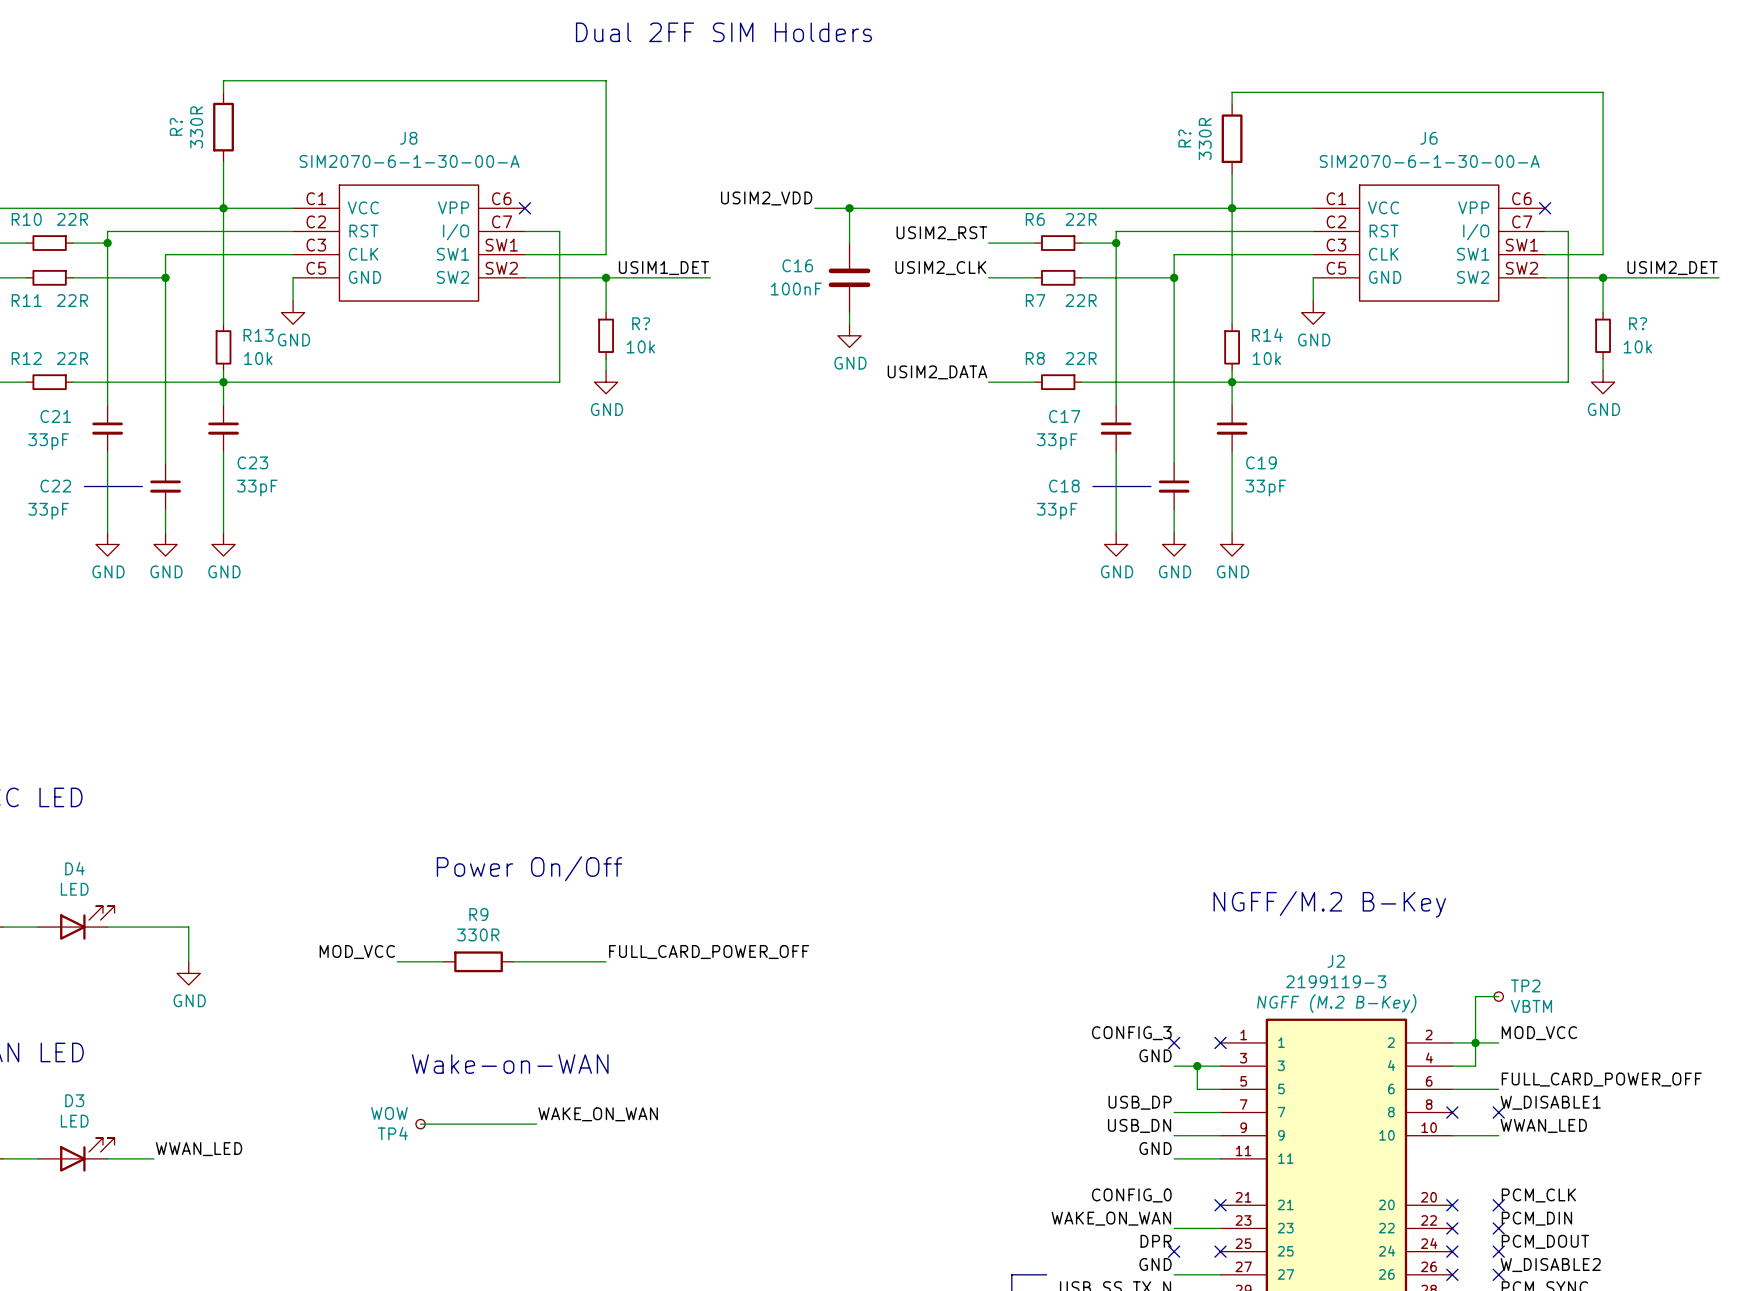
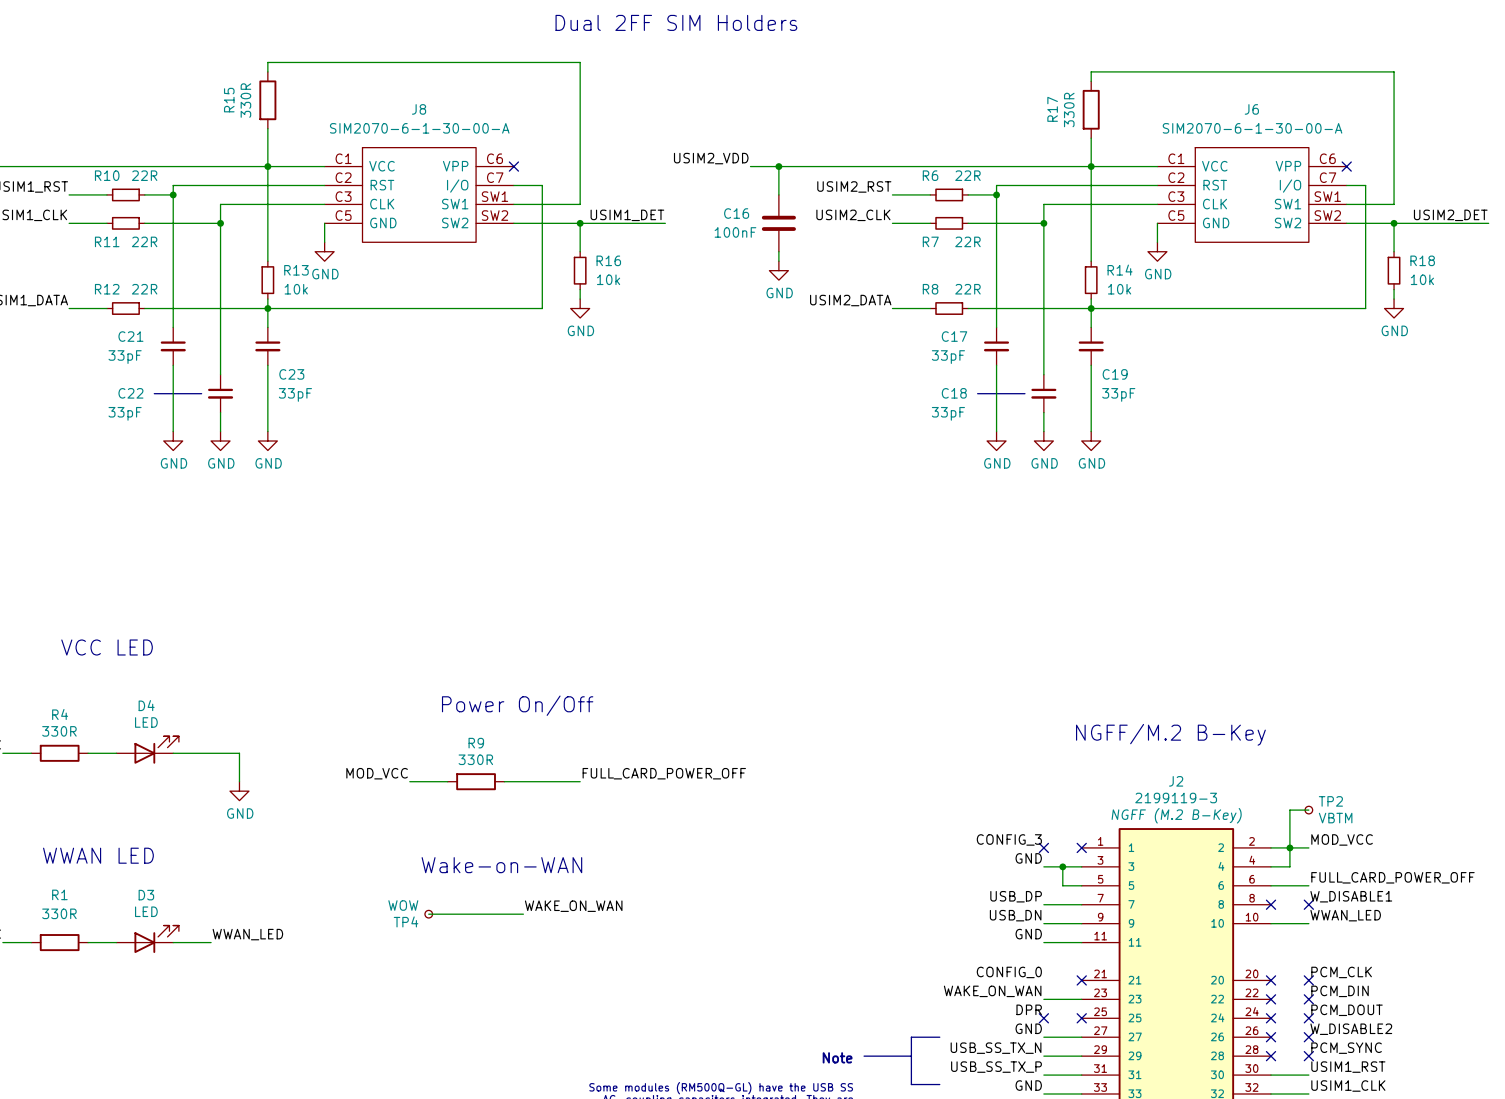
R? name: R? (176, 126) -> R15 (229, 100)
R? name: R? (1184, 138) -> R17 (1052, 109)
R? name: R? (641, 323) -> R16 (608, 260)
R? name: R? (1638, 323) -> R18 (1422, 260)

